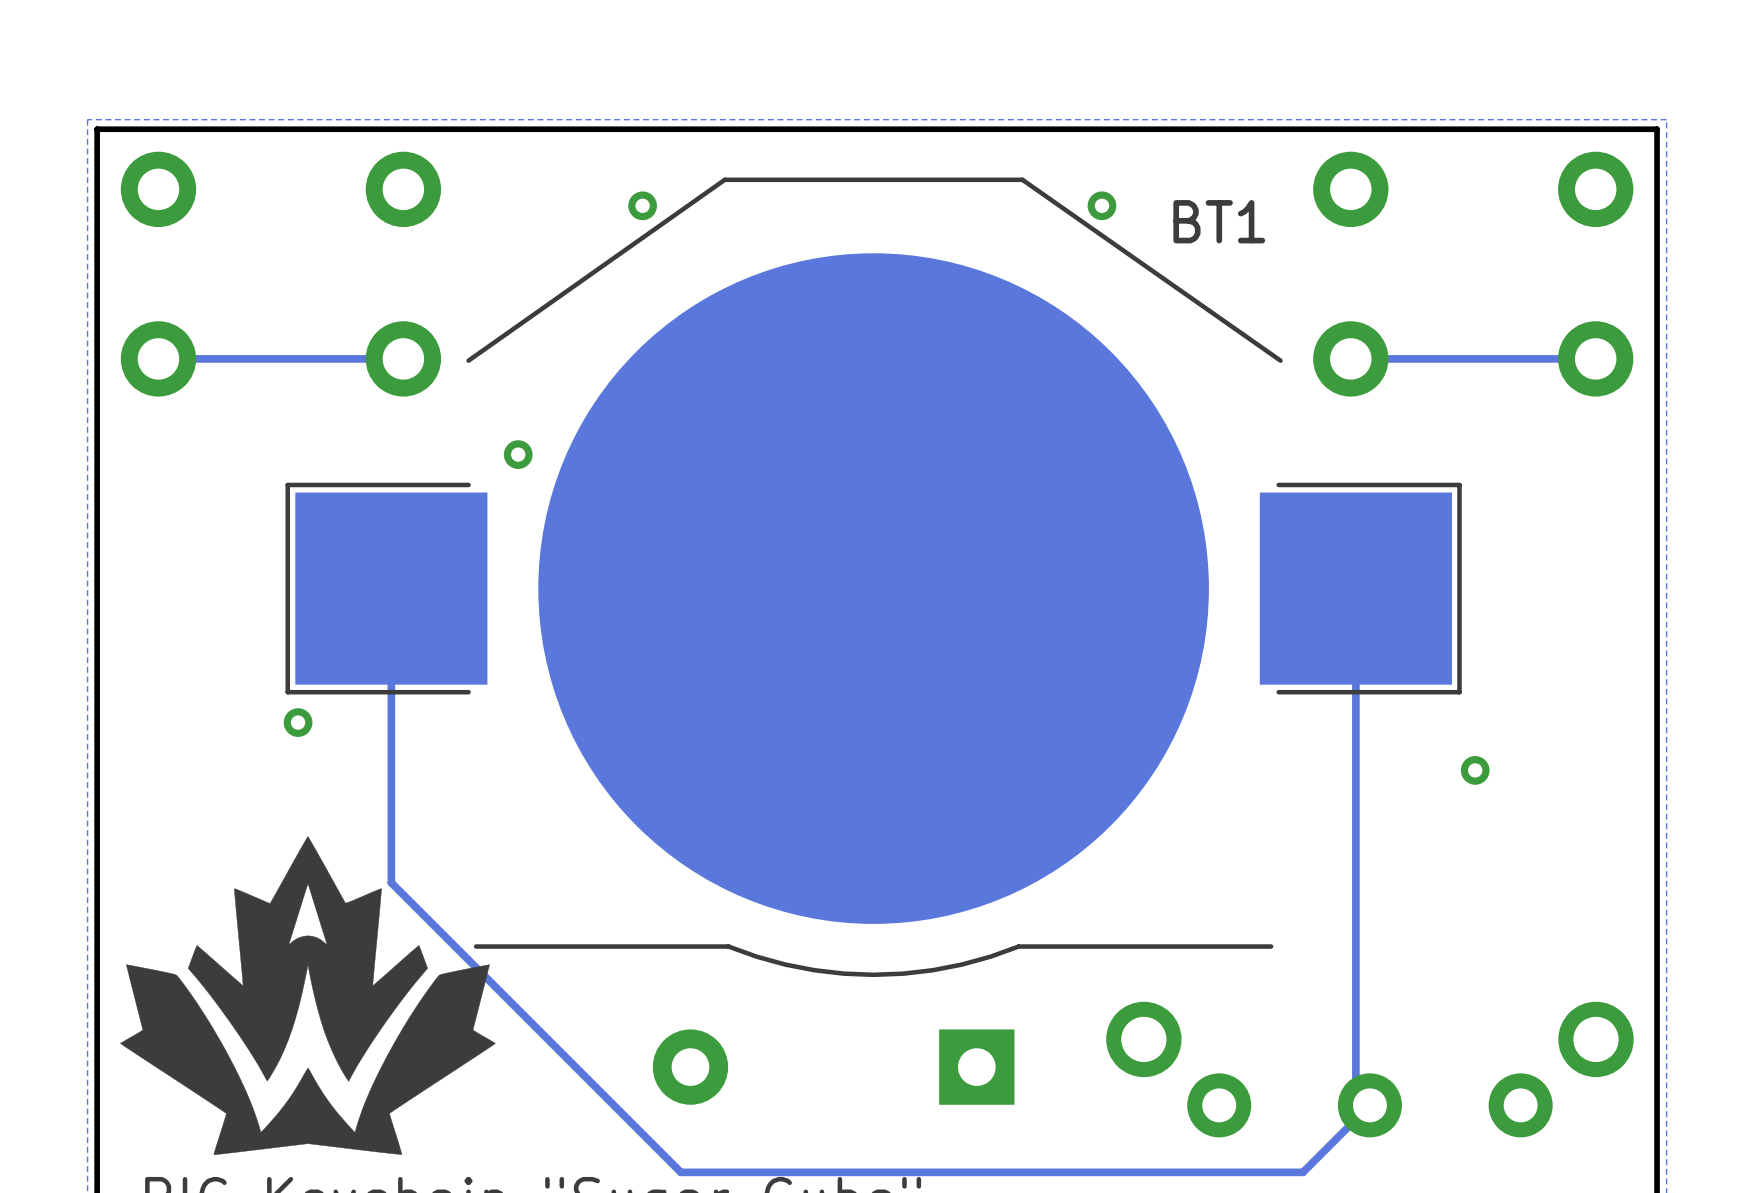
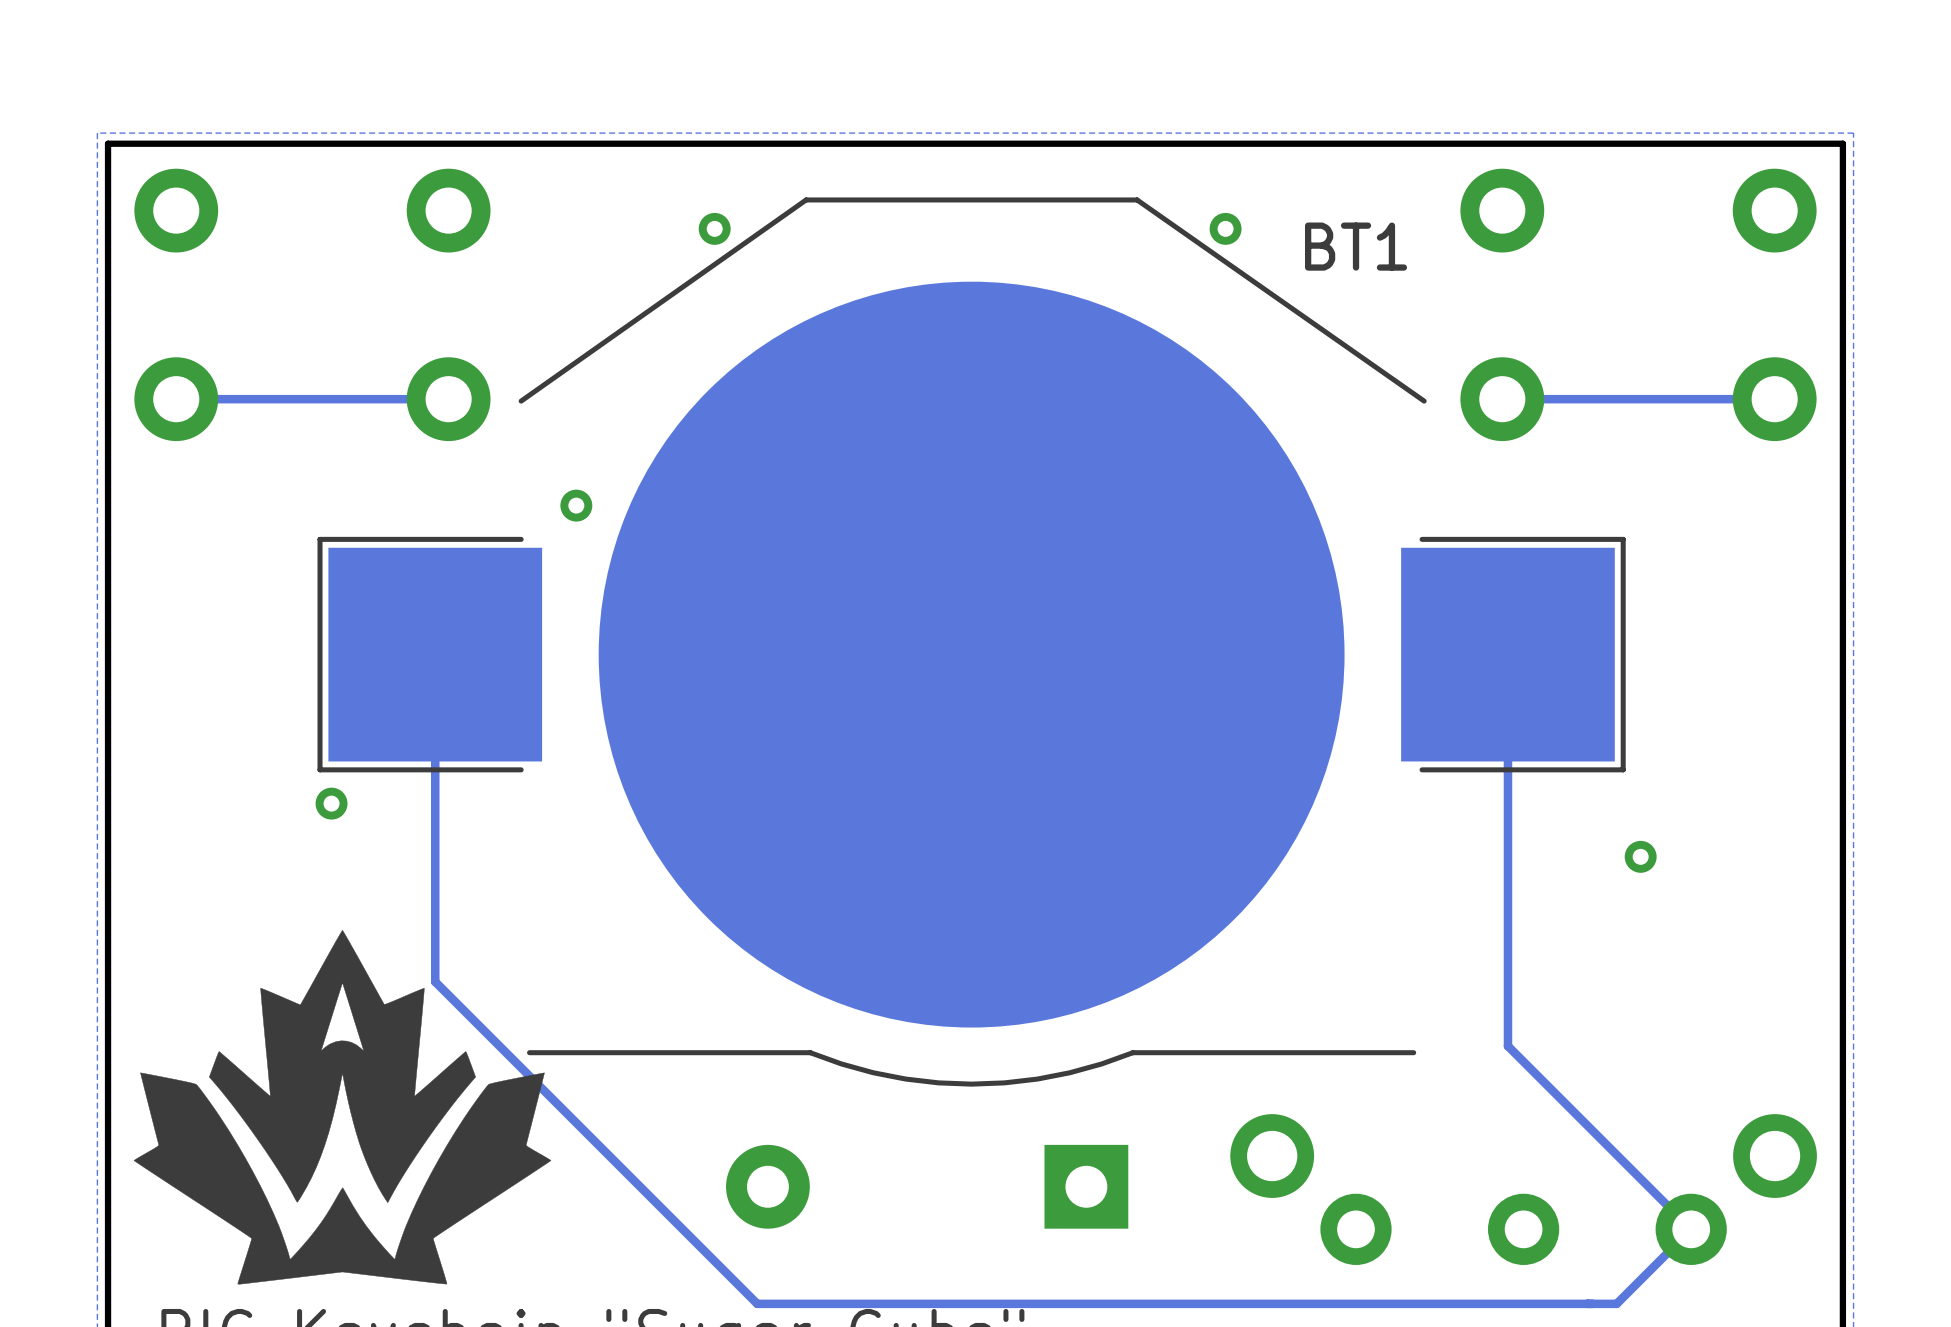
track: (1355, 940) (1355, 1091) (1369, 1105) (1302, 1172) -> (1507, 1046) (1691, 1229) (1616, 1303) (1449, 1303)

